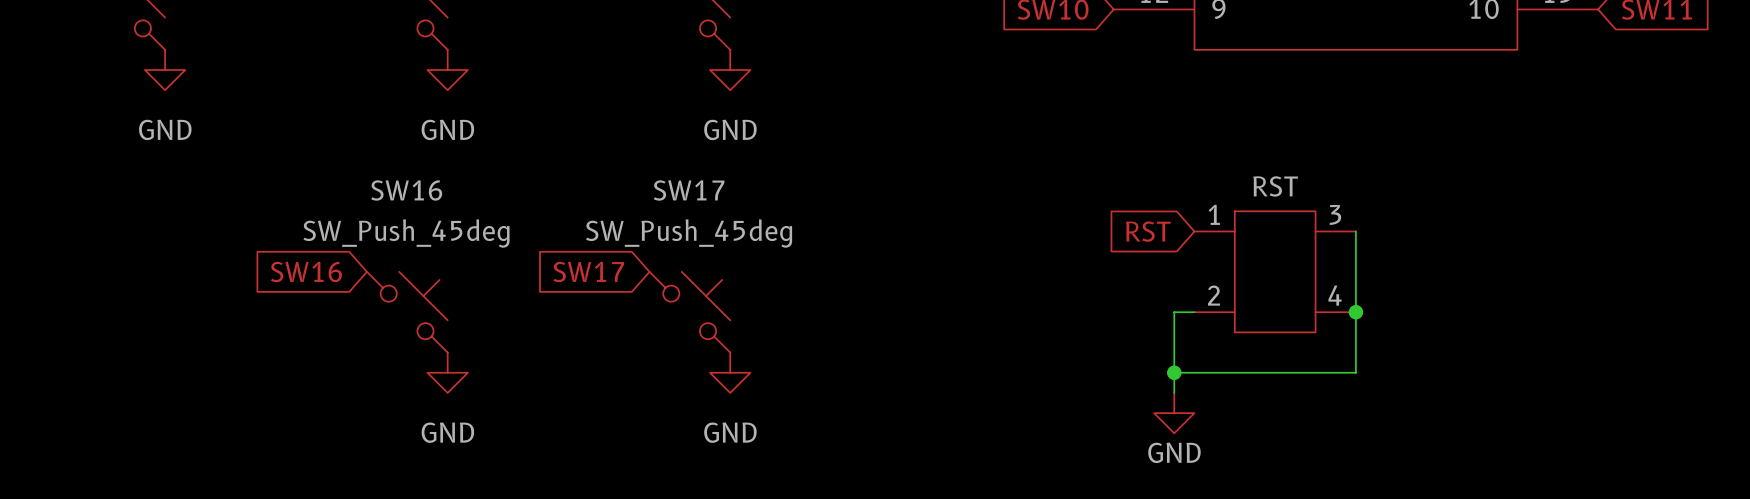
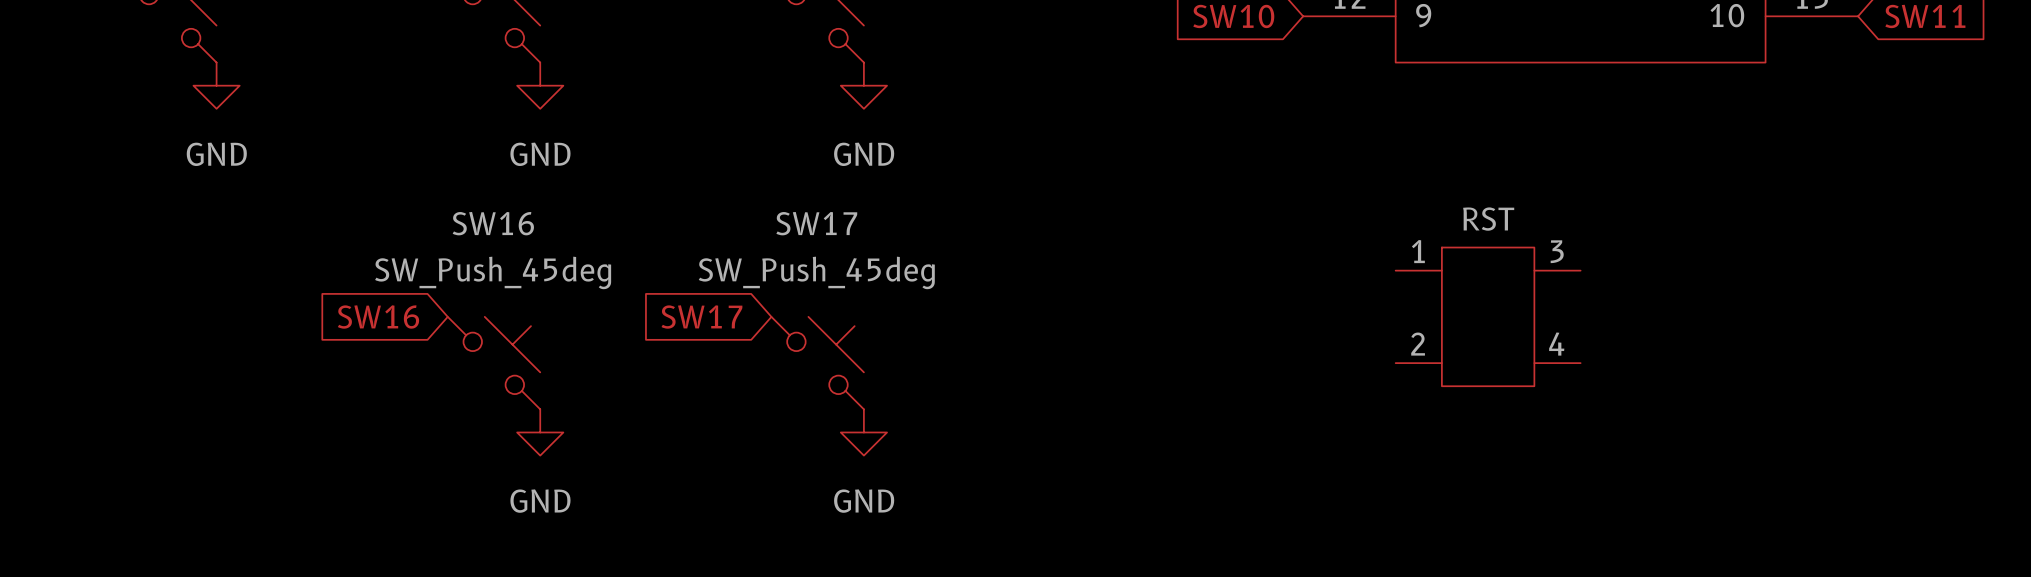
global label: RST (1148, 231) -> none
wire: (1355, 231) (1355, 372) (1174, 372) -> none
wire: (1194, 312) (1174, 312) (1174, 392) -> none
junction: (1355, 312) -> none
junction: (1174, 372) -> none
power symbol: GND (1174, 413) -> none

